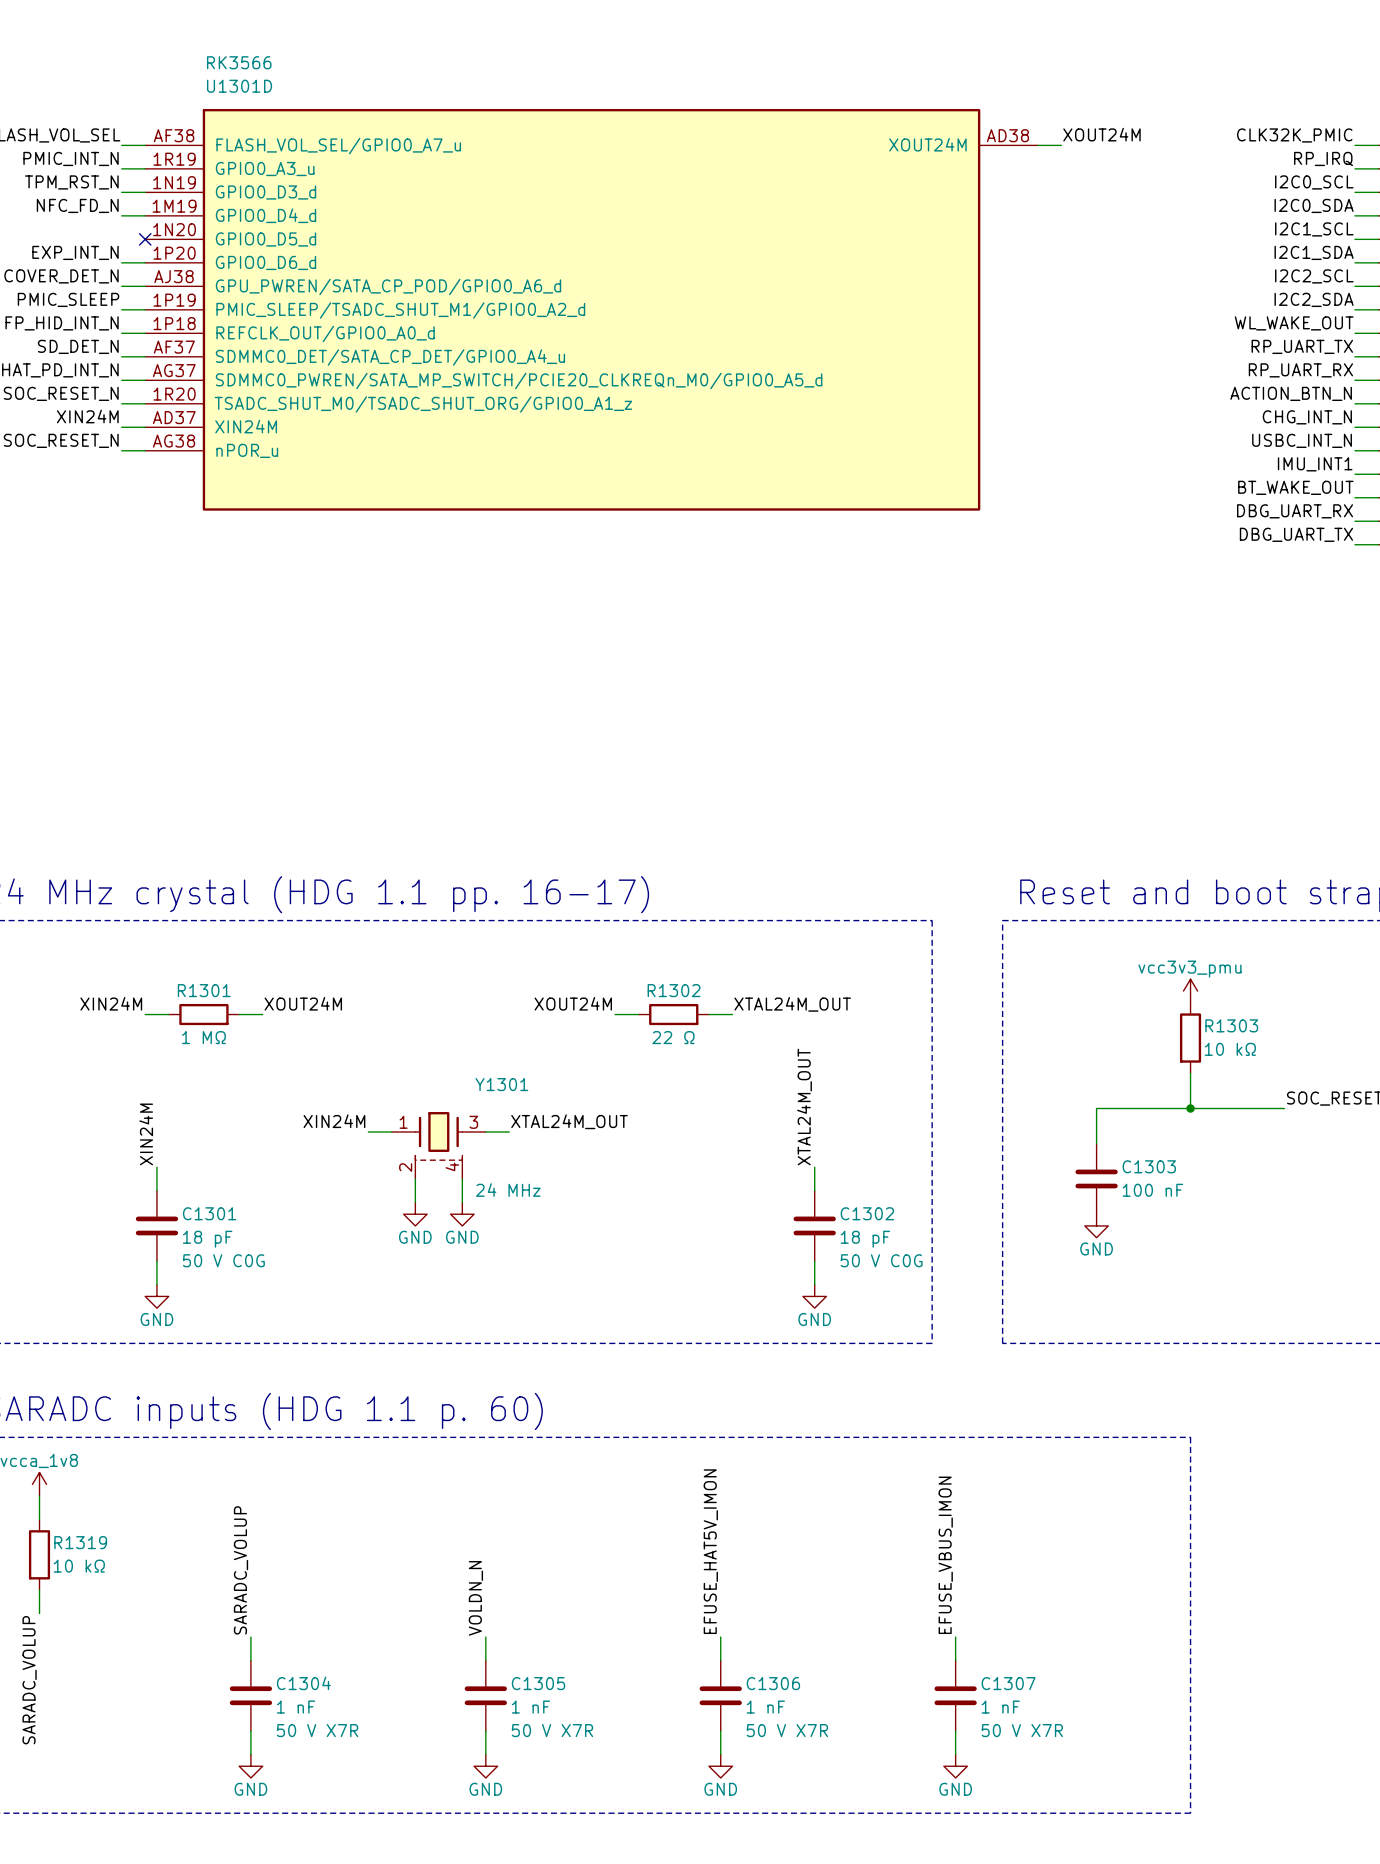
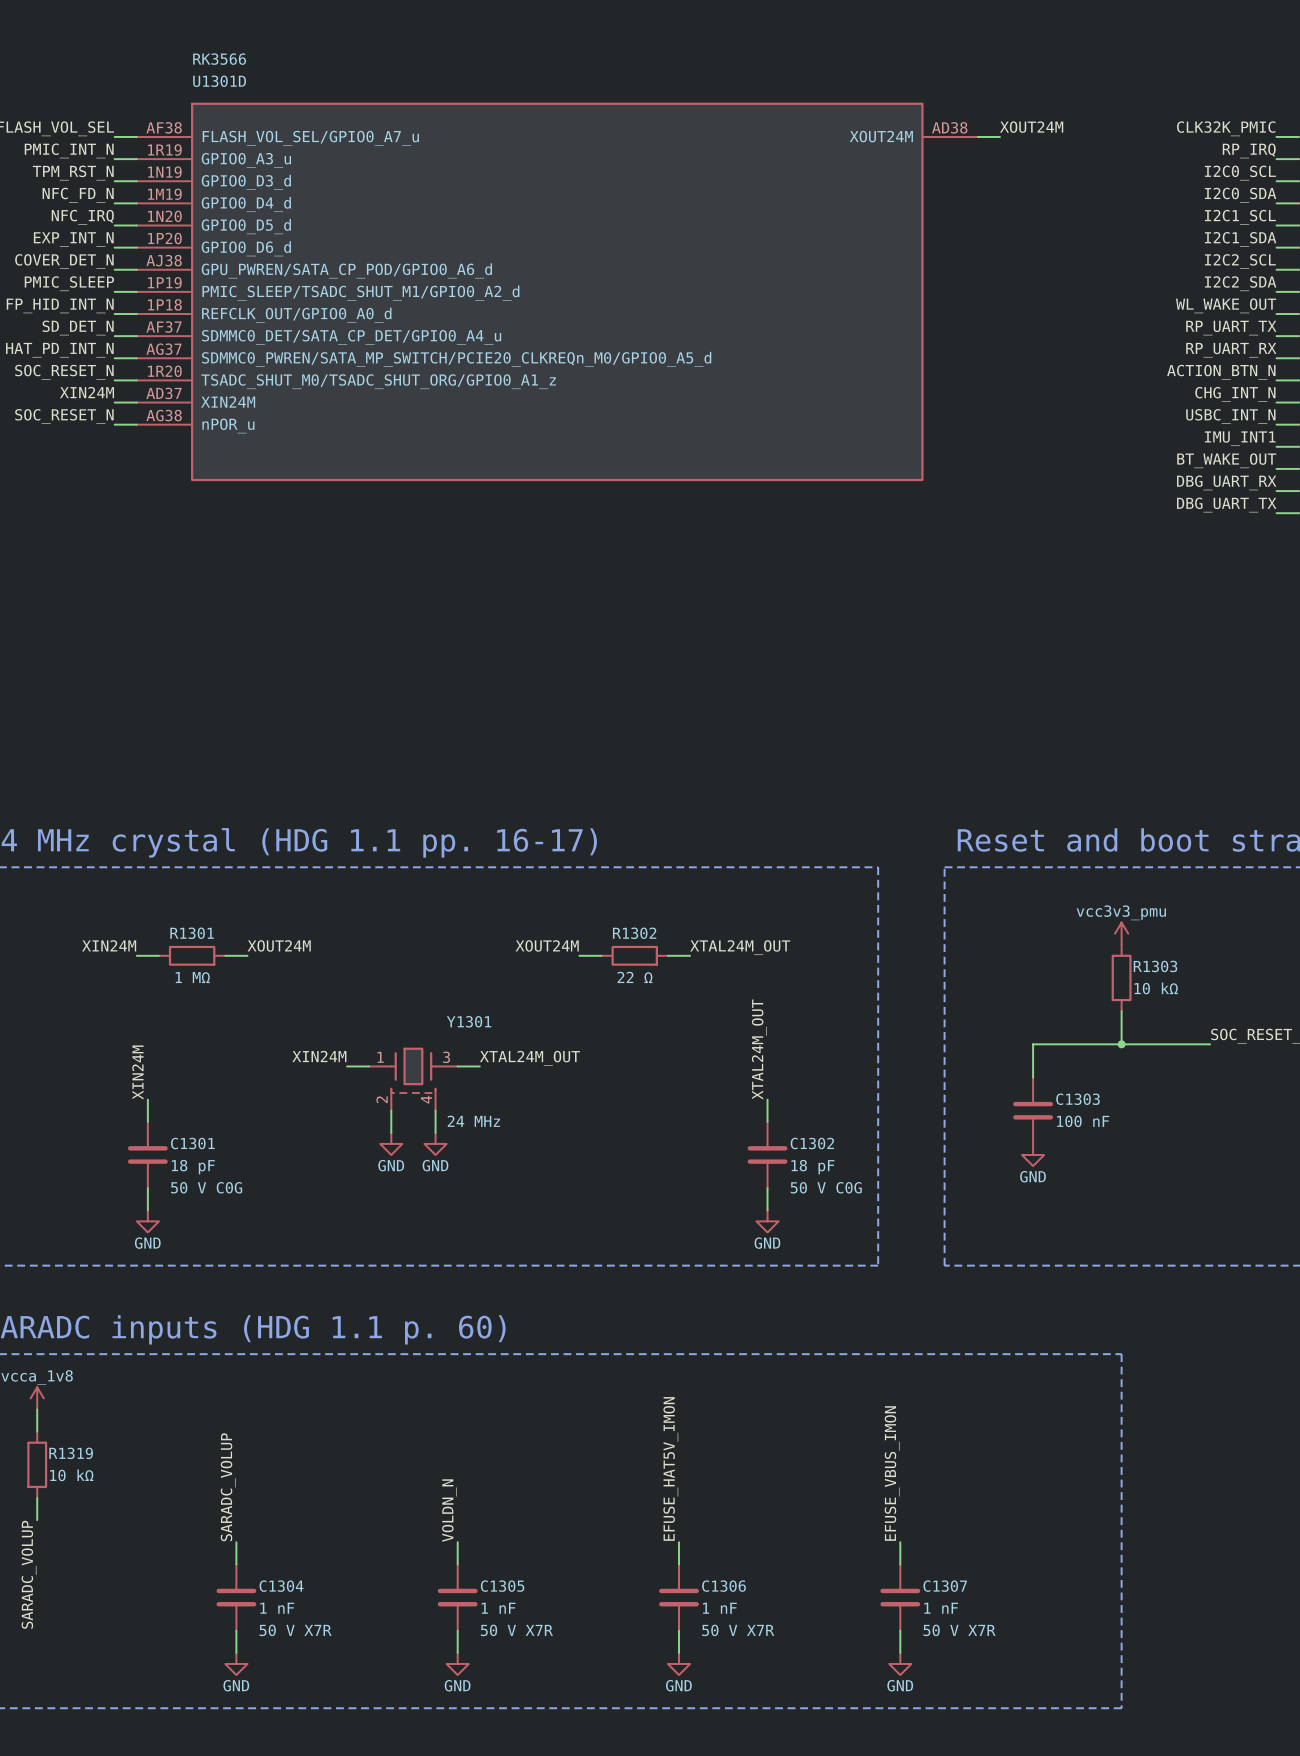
label: none -> NFC_IRQ (82, 217)
wire: none -> (114, 225) (136, 225)
no-connect mark: (145, 239) -> none

